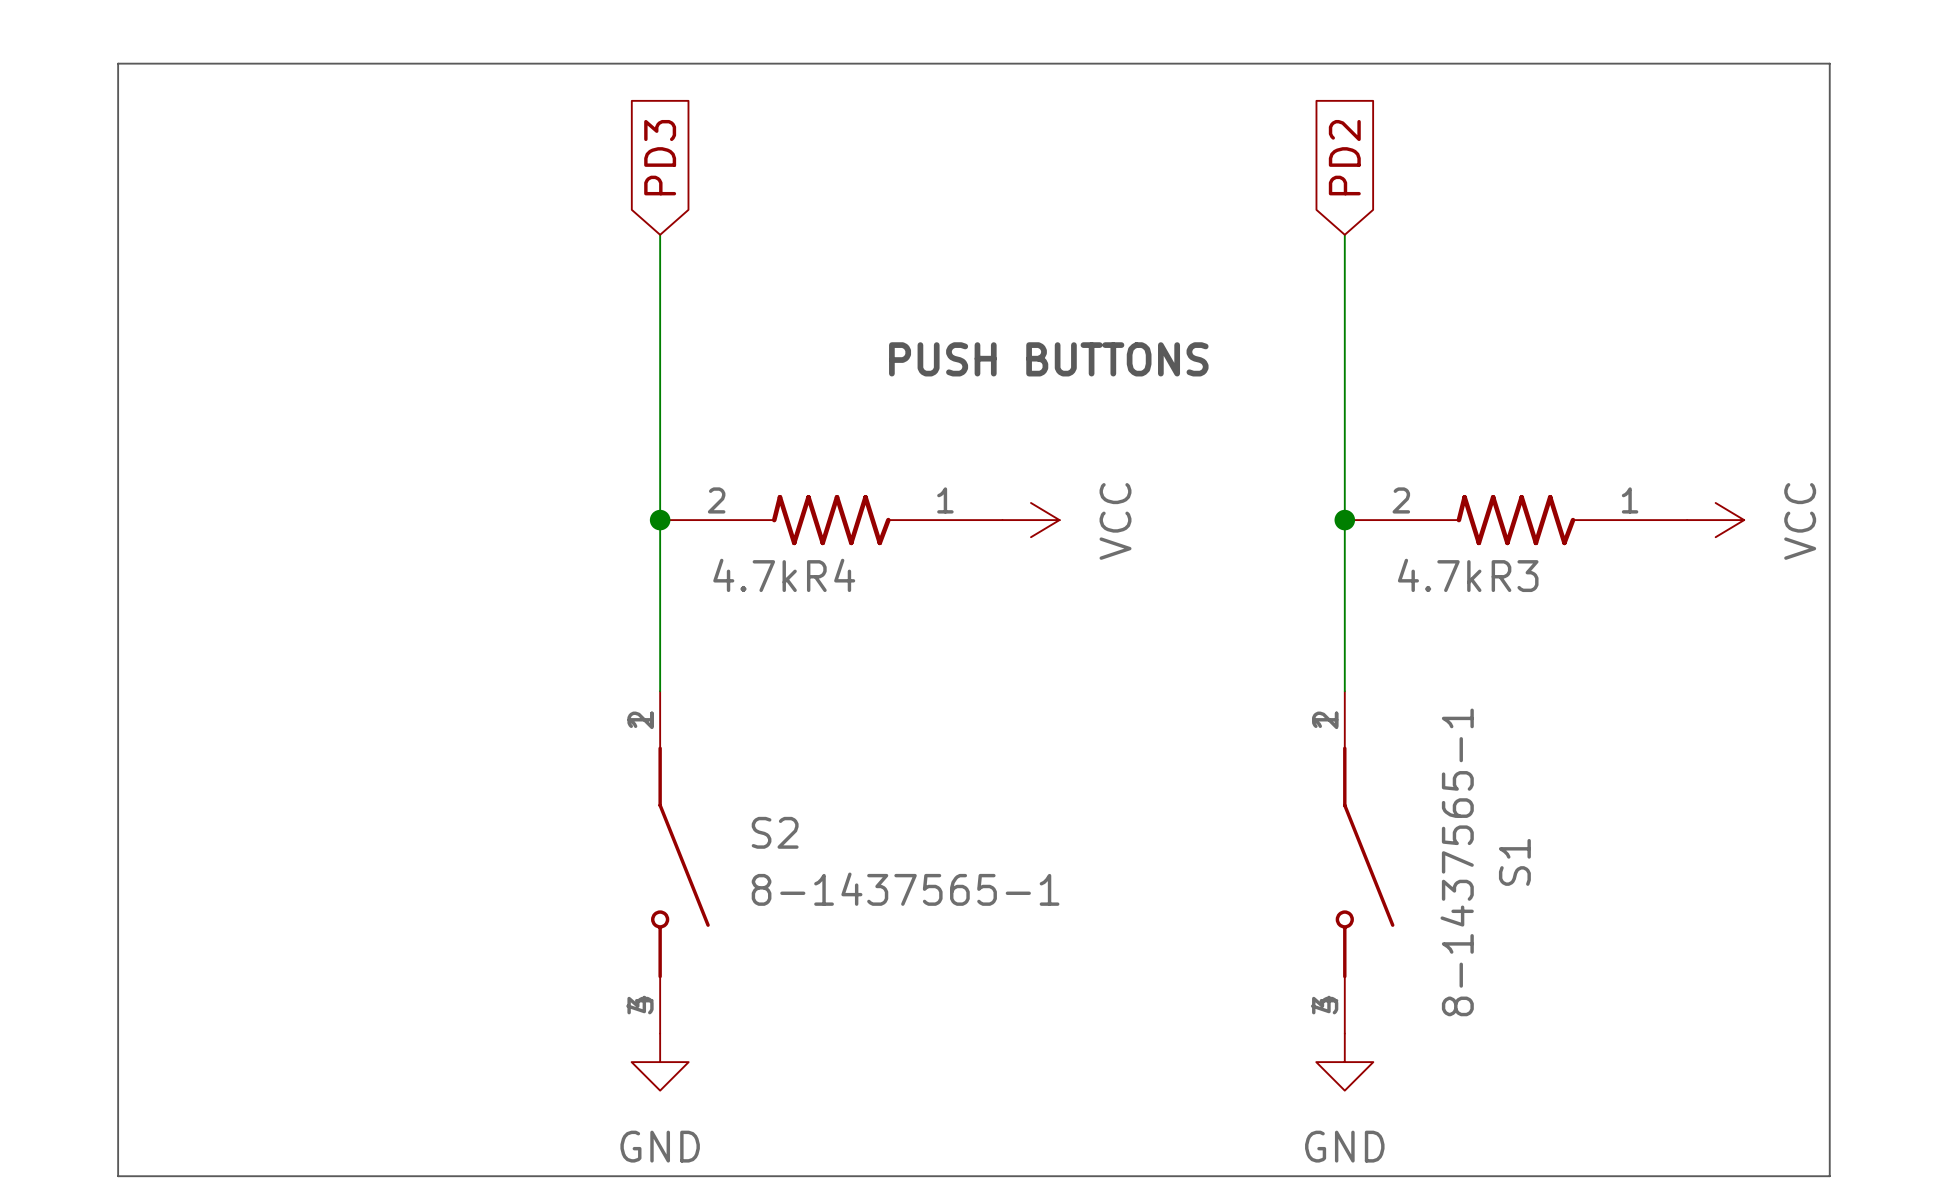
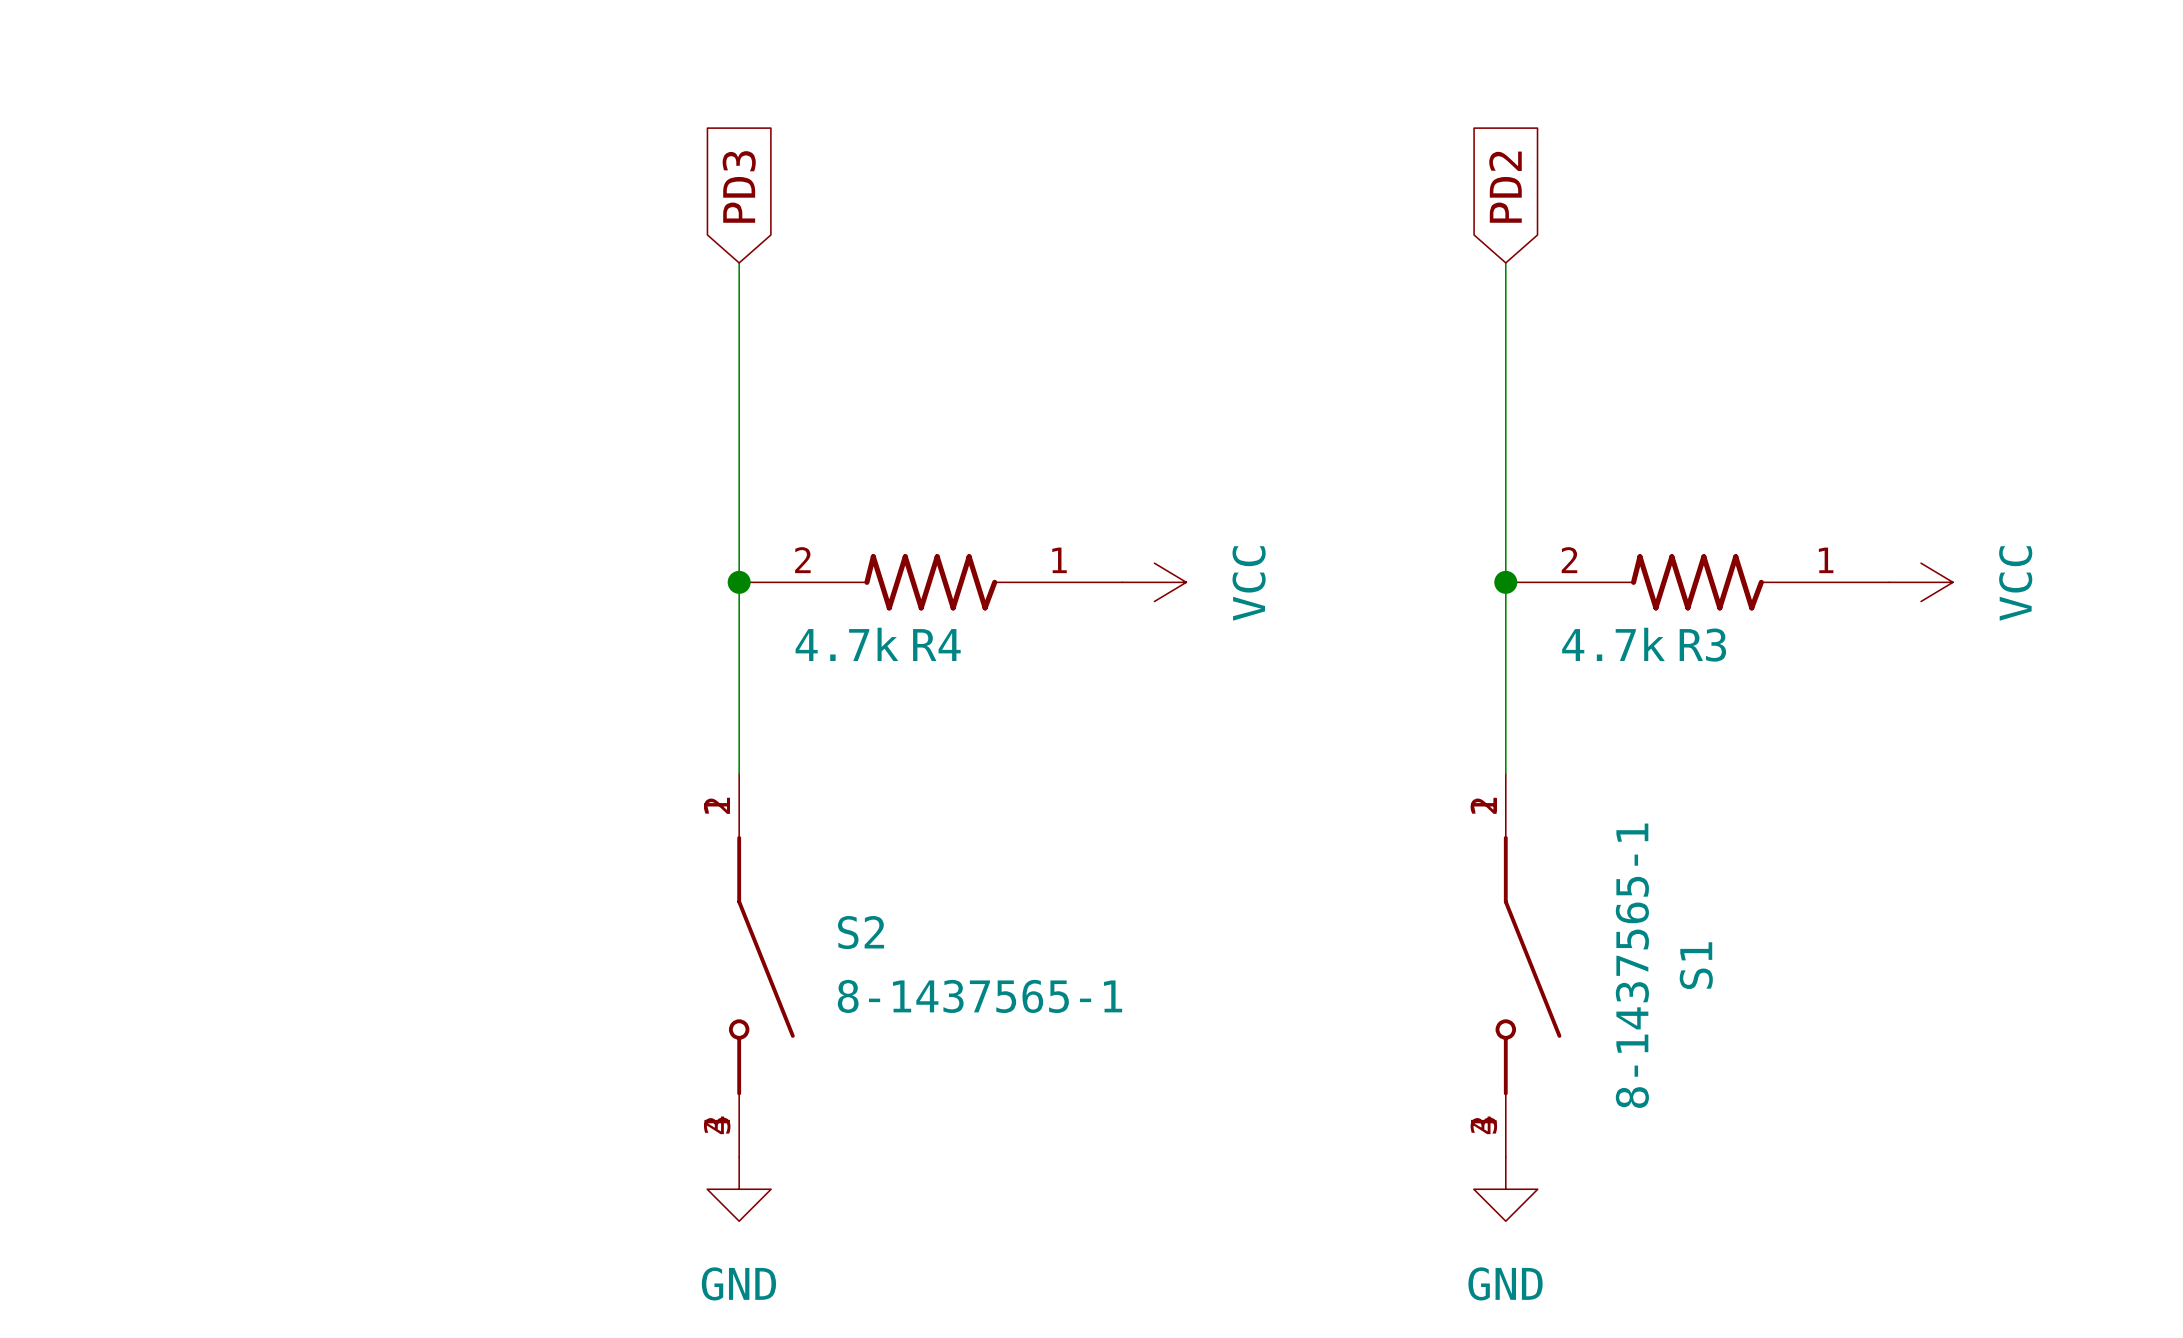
line: (118, 63) (118, 1176) (1829, 1176) (1829, 63) (118, 63) -> none
text: PUSH BUTTONS (1048, 359) -> none

